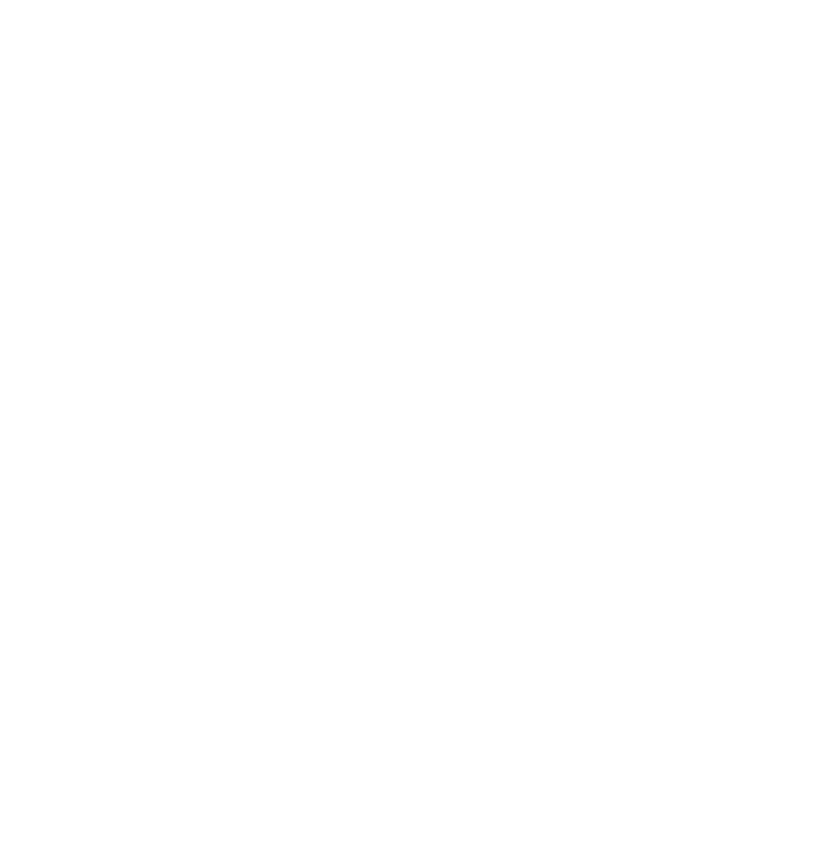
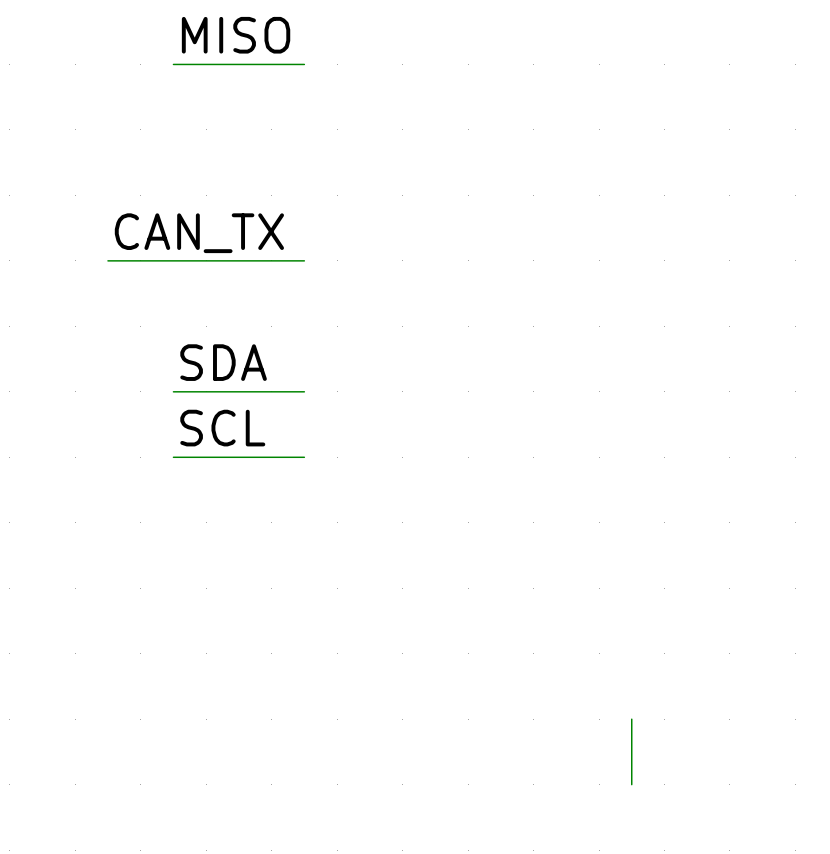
label: none -> MISO (236, 35)
wire: none -> (173, 64) (304, 64)
label: none -> CAN_TX (199, 233)
wire: none -> (107, 260) (304, 260)
label: none -> SDA (223, 362)
wire: none -> (173, 391) (304, 391)
label: none -> SCL (222, 428)
wire: none -> (173, 457) (304, 457)
wire: none -> (631, 719) (631, 784)

